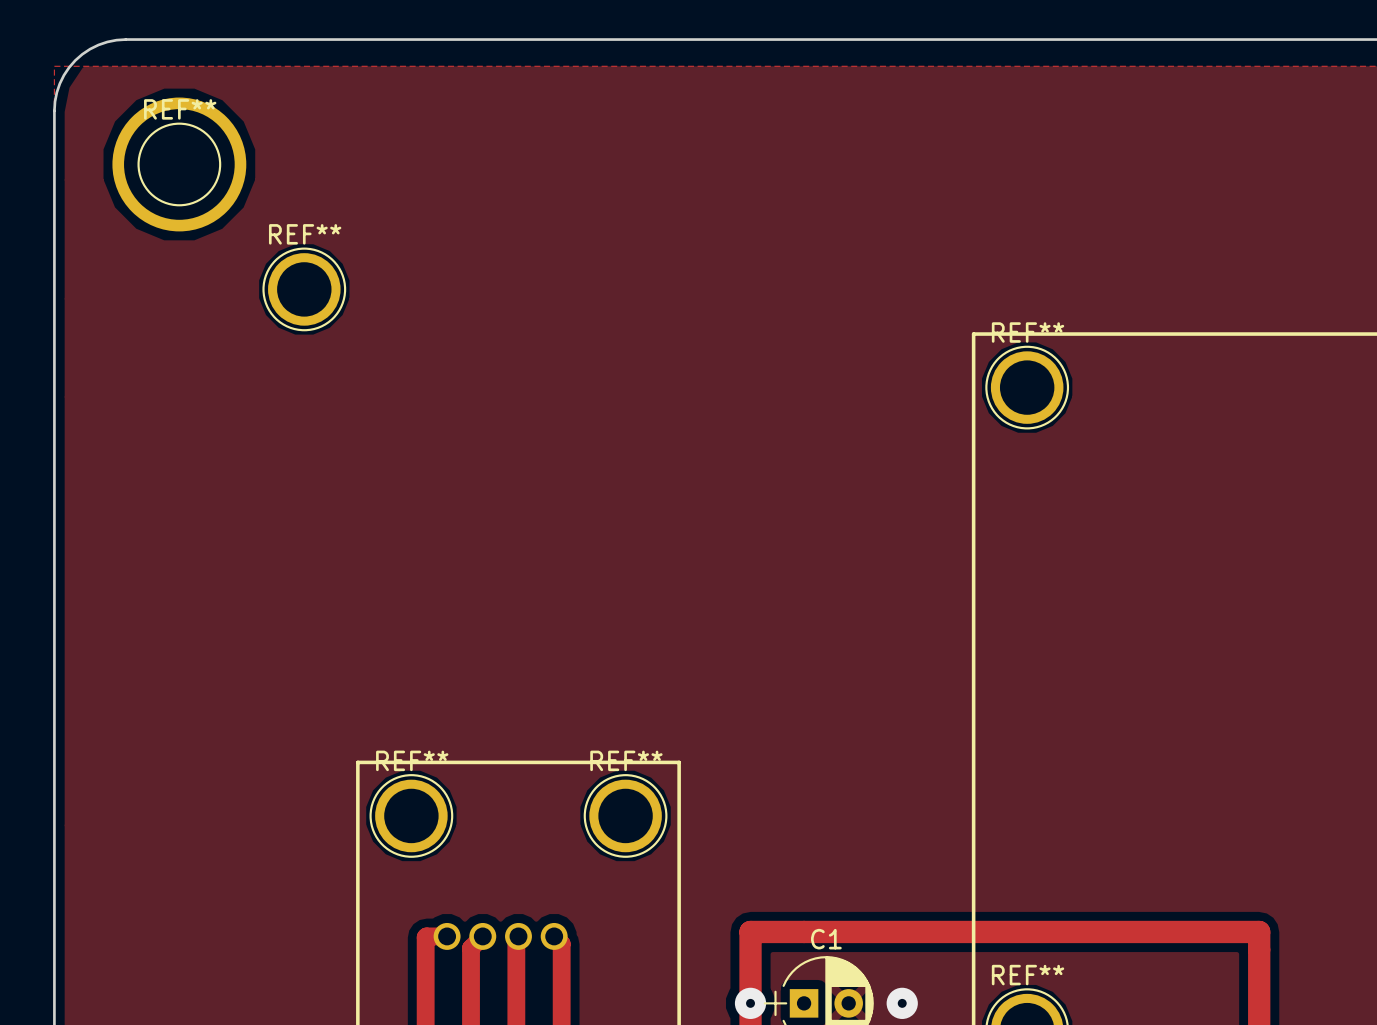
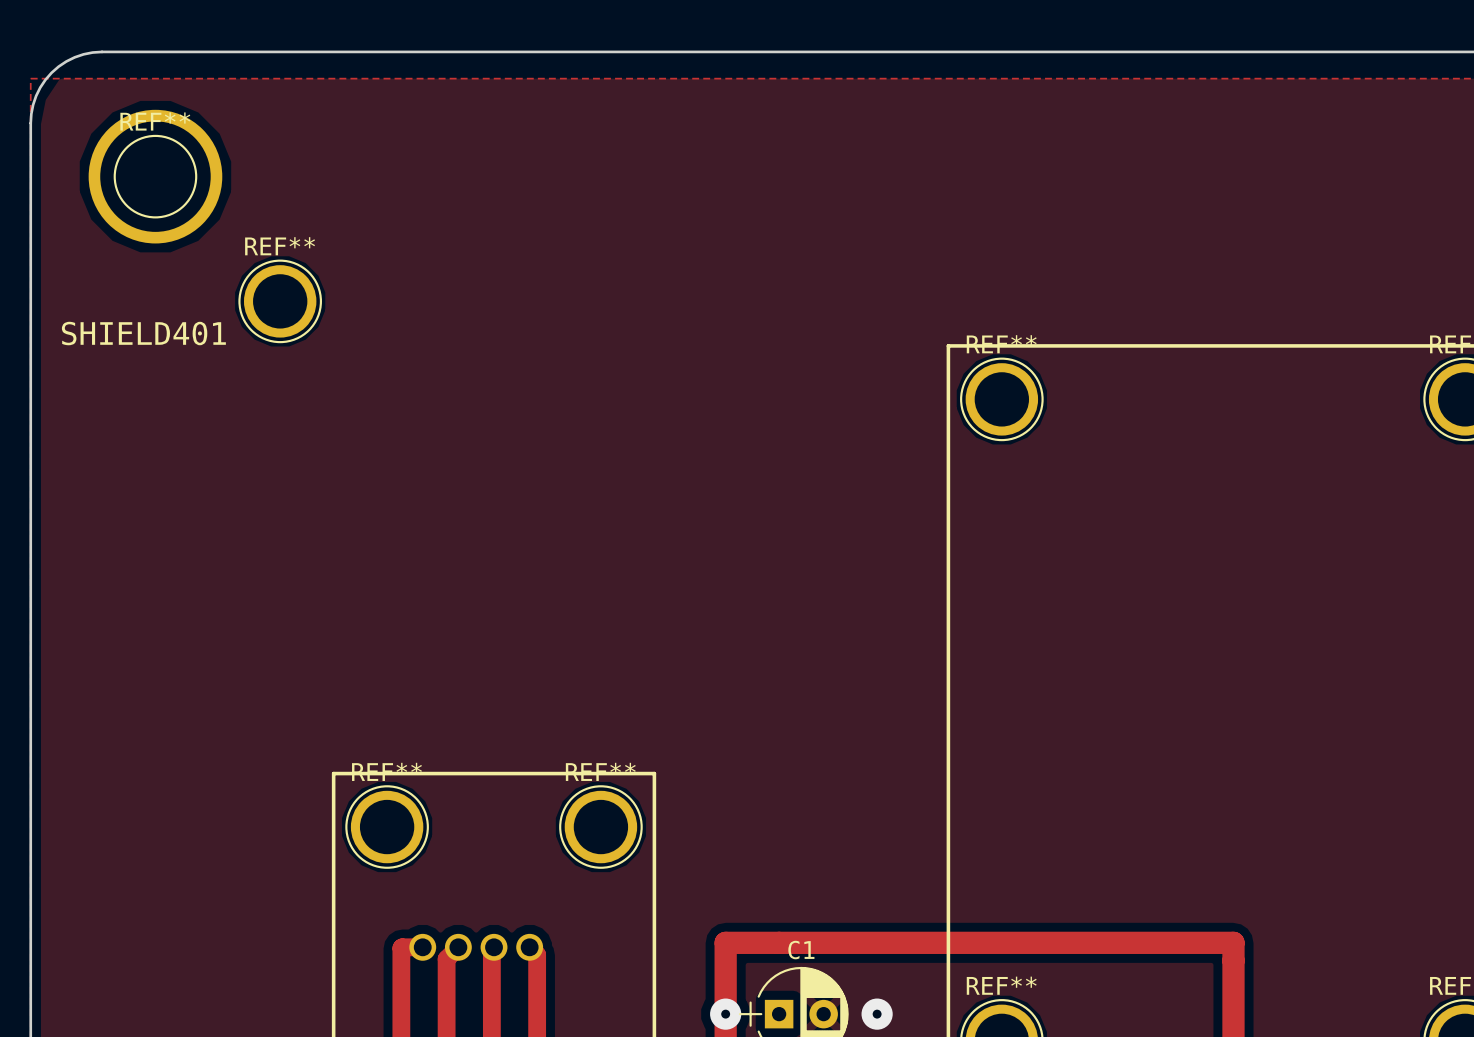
SHIELD401: none -> (143, 333)

